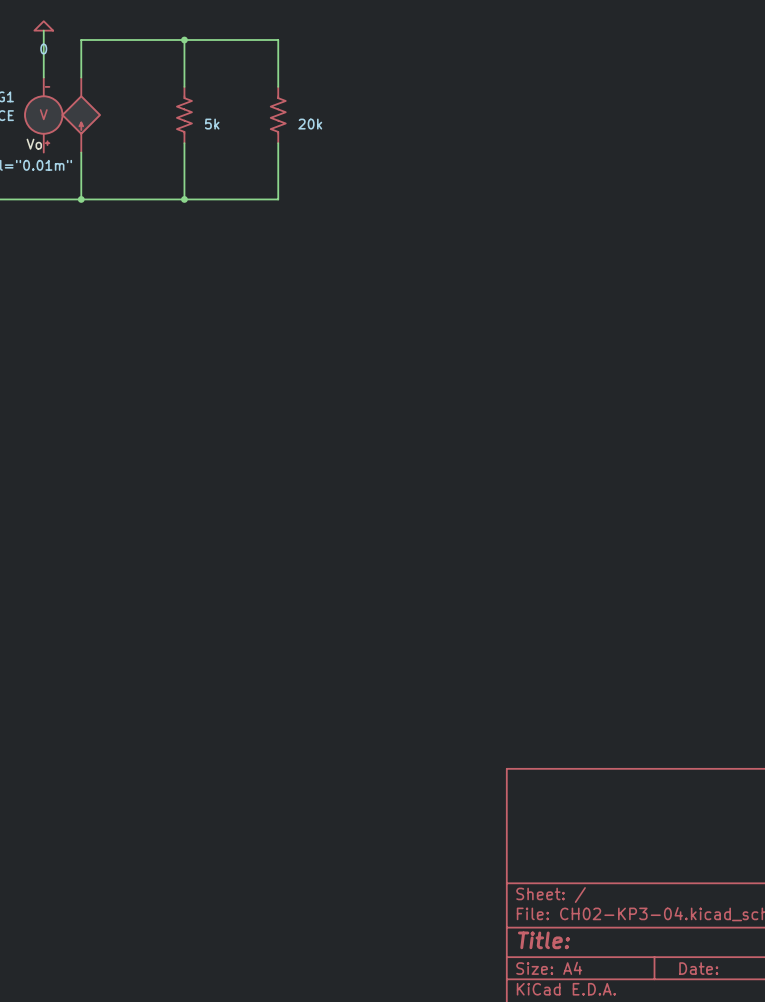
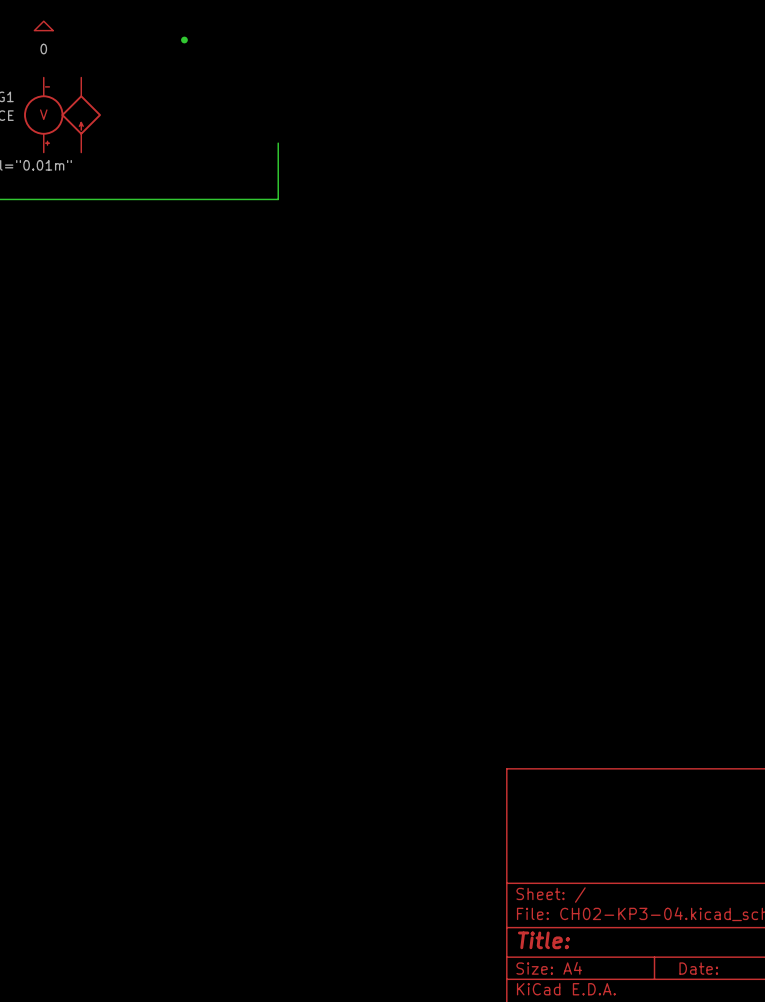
wire: (43, 30) (43, 77) -> none
wire: (184, 40) (184, 86) -> none
wire: (81, 77) (81, 40) (278, 40) (278, 86) -> none
part: 5k (184, 115) -> none
part: 20k (278, 115) -> none
wire: (184, 143) (184, 199) -> none
label: Vo (34, 144) -> none
wire: (81, 152) (81, 199) -> none
junction: (81, 199) -> none
junction: (184, 199) -> none

